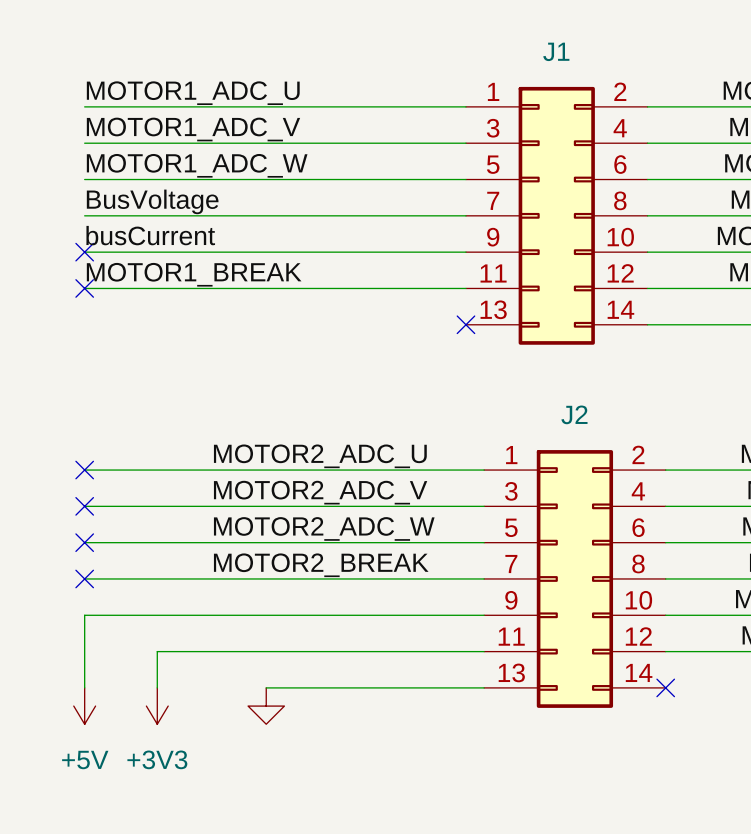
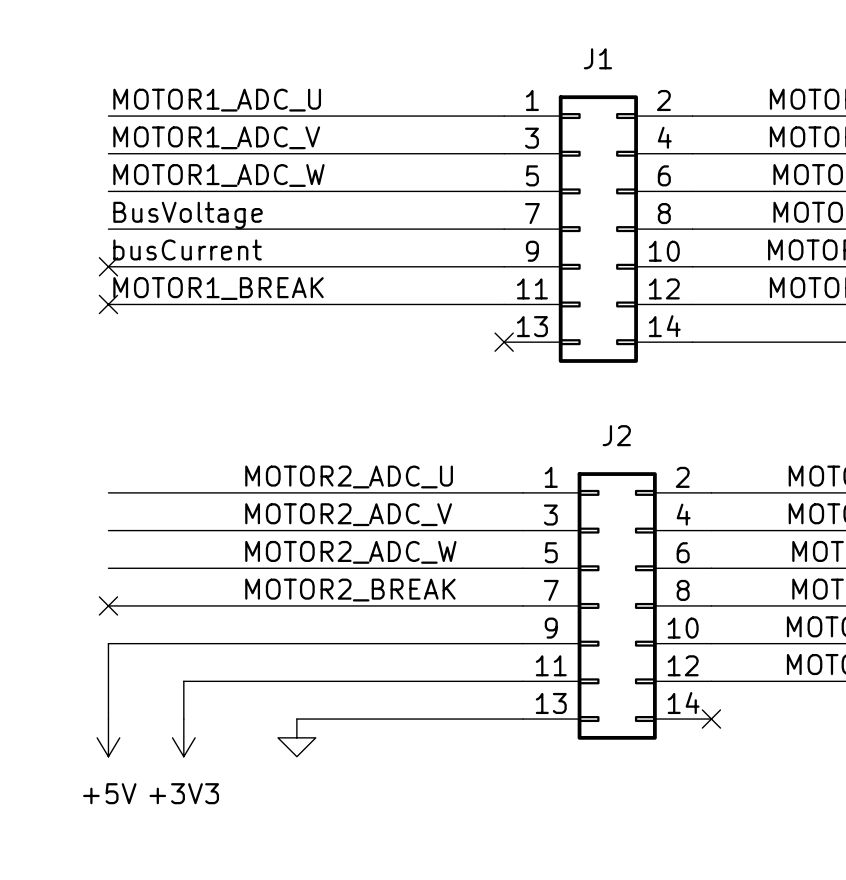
no-connect mark: (84, 470) -> none
no-connect mark: (84, 506) -> none
no-connect mark: (84, 542) -> none

